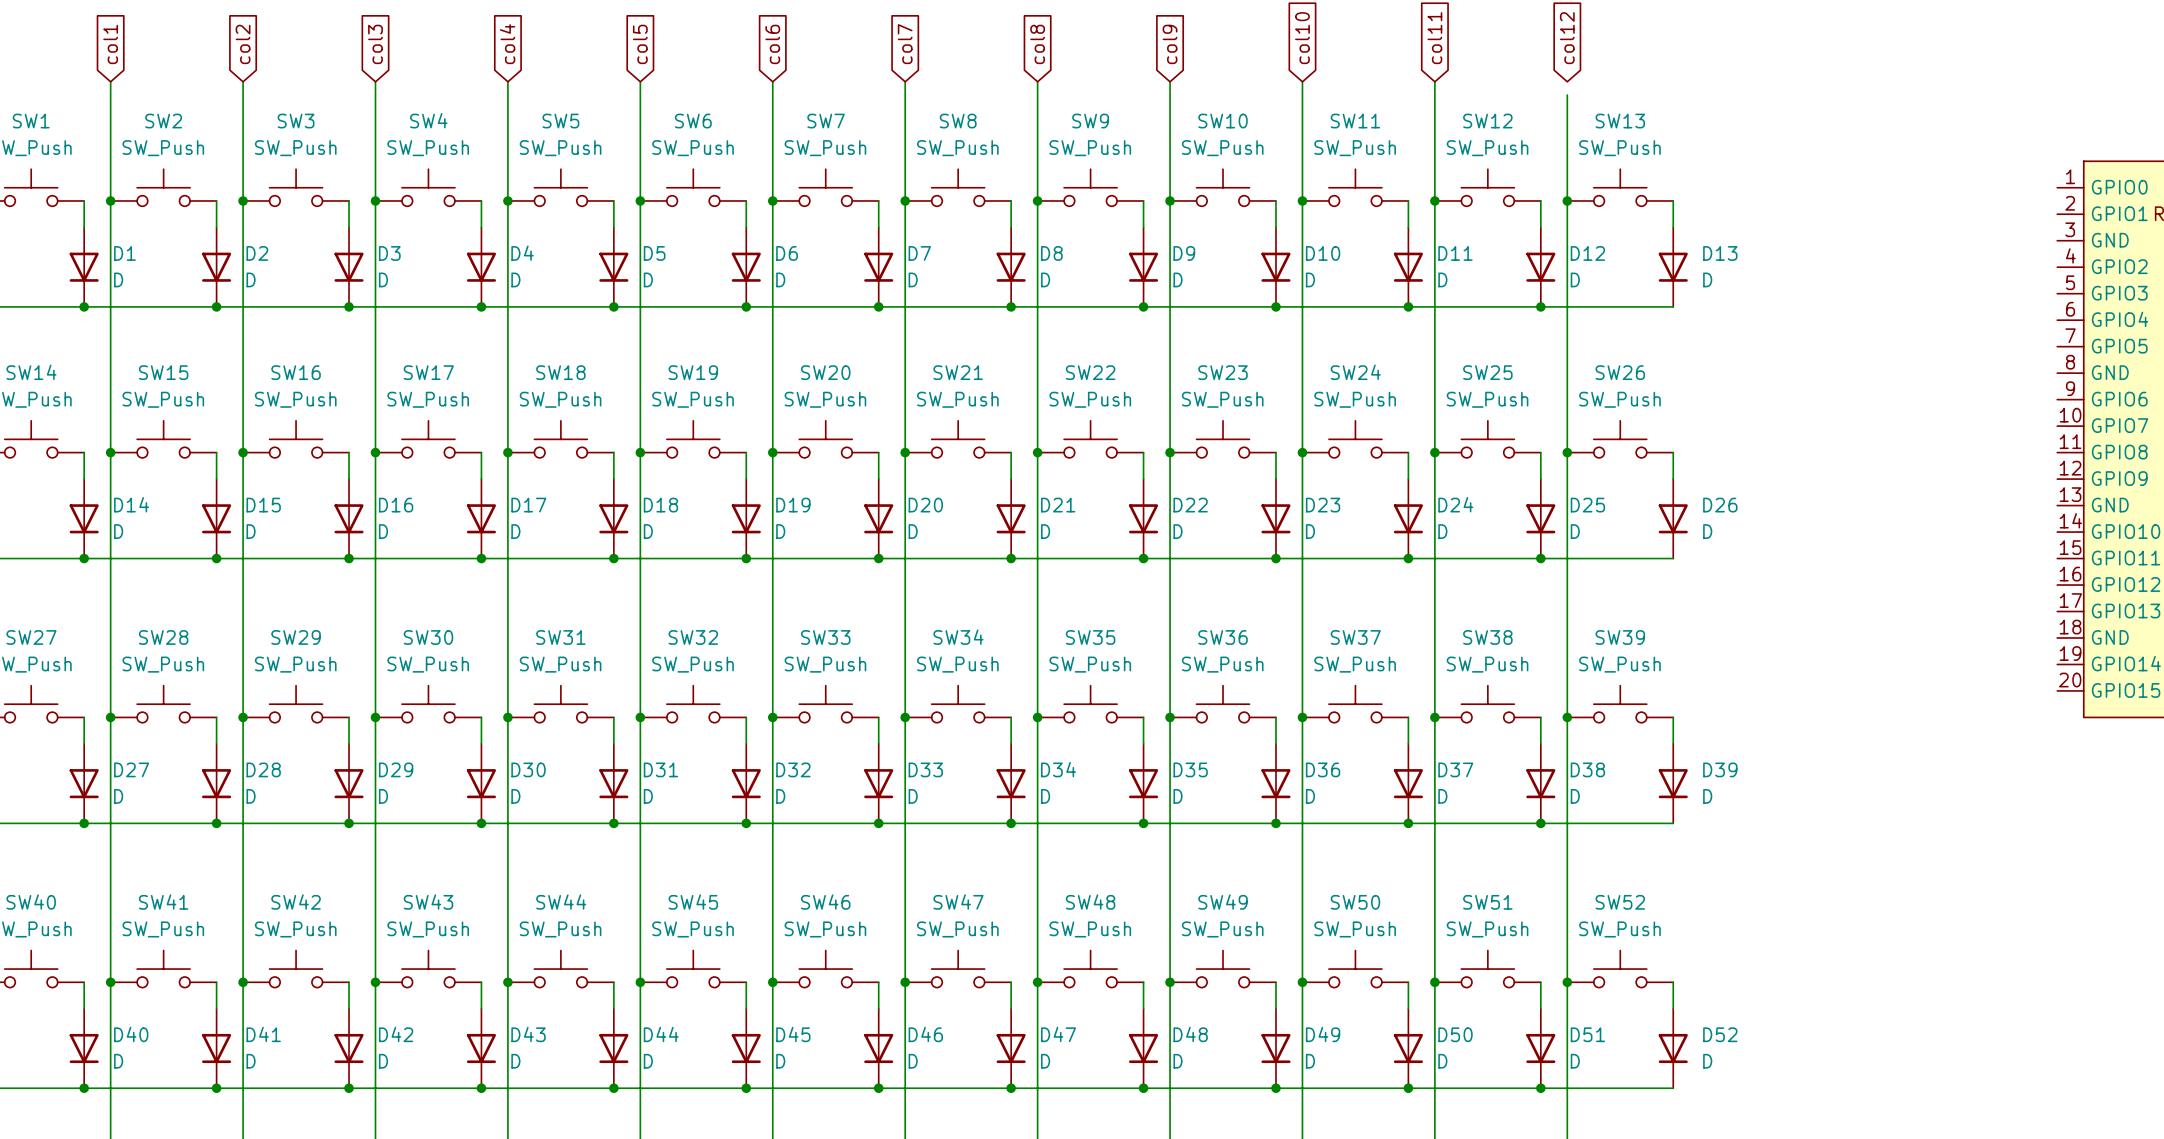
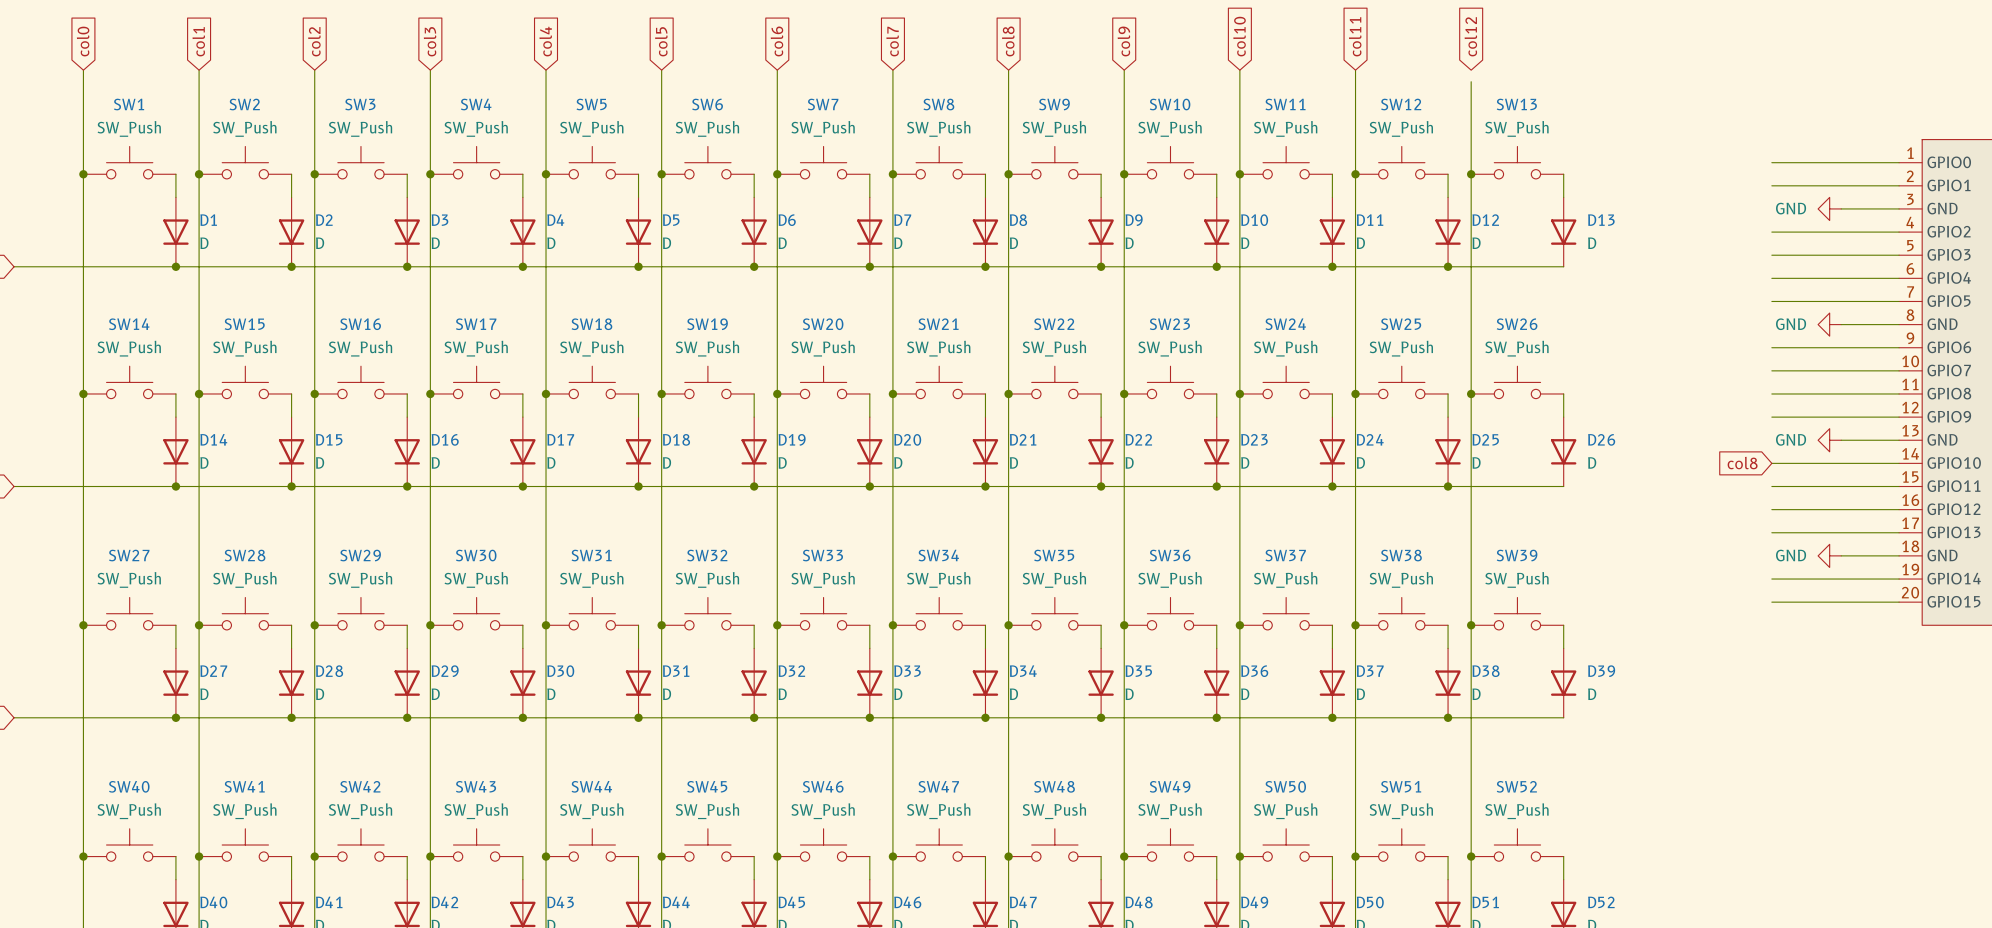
wire: none -> (1771, 162) (1899, 162)
wire: none -> (1771, 185) (1899, 185)
power symbol: none -> GND (1829, 208)
wire: none -> (1841, 208) (1899, 208)
wire: none -> (1771, 232) (1899, 232)
wire: none -> (1771, 255) (1899, 255)
wire: none -> (1771, 278) (1899, 278)
wire: none -> (1771, 301) (1899, 301)
power symbol: none -> GND (1829, 324)
wire: none -> (1841, 324) (1899, 324)
wire: none -> (1771, 347) (1899, 347)
wire: none -> (1771, 370) (1899, 370)
wire: none -> (1771, 393) (1899, 393)
wire: none -> (1771, 417) (1899, 417)
power symbol: none -> GND (1829, 440)
wire: none -> (1841, 440) (1899, 440)
global label: none -> col8 (1742, 463)
wire: none -> (1771, 463) (1899, 463)
wire: none -> (1771, 486) (1899, 486)
wire: none -> (1771, 509) (1899, 509)
wire: none -> (1771, 532) (1899, 532)
power symbol: none -> GND (1829, 555)
wire: none -> (1841, 555) (1899, 555)
wire: none -> (1771, 579) (1899, 579)
wire: none -> (1771, 602) (1899, 602)

